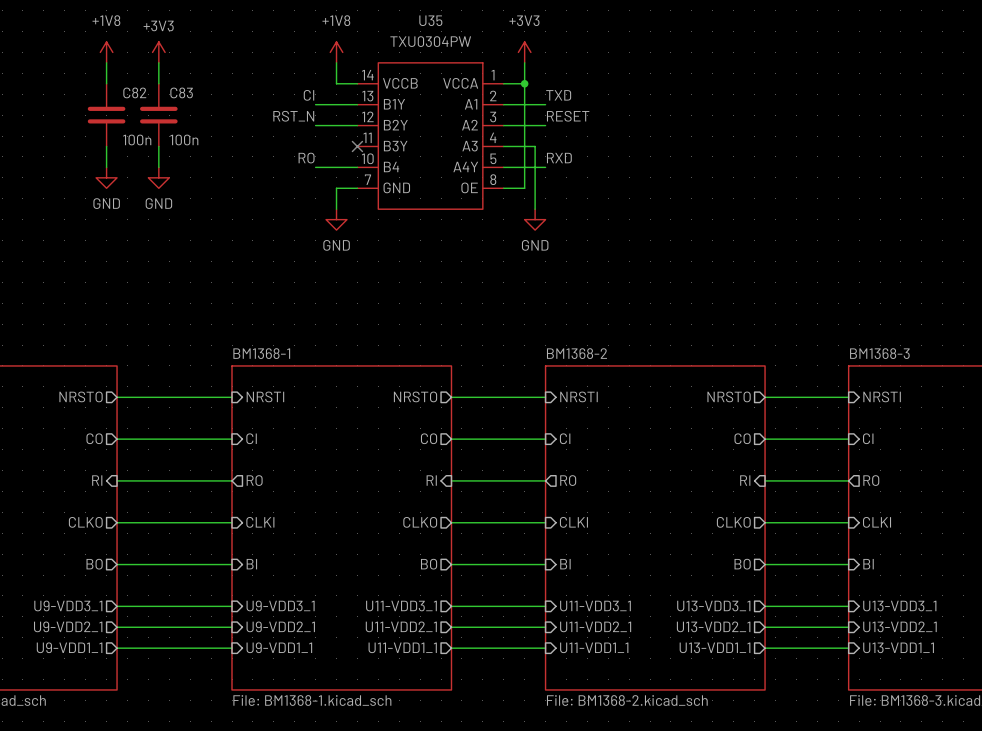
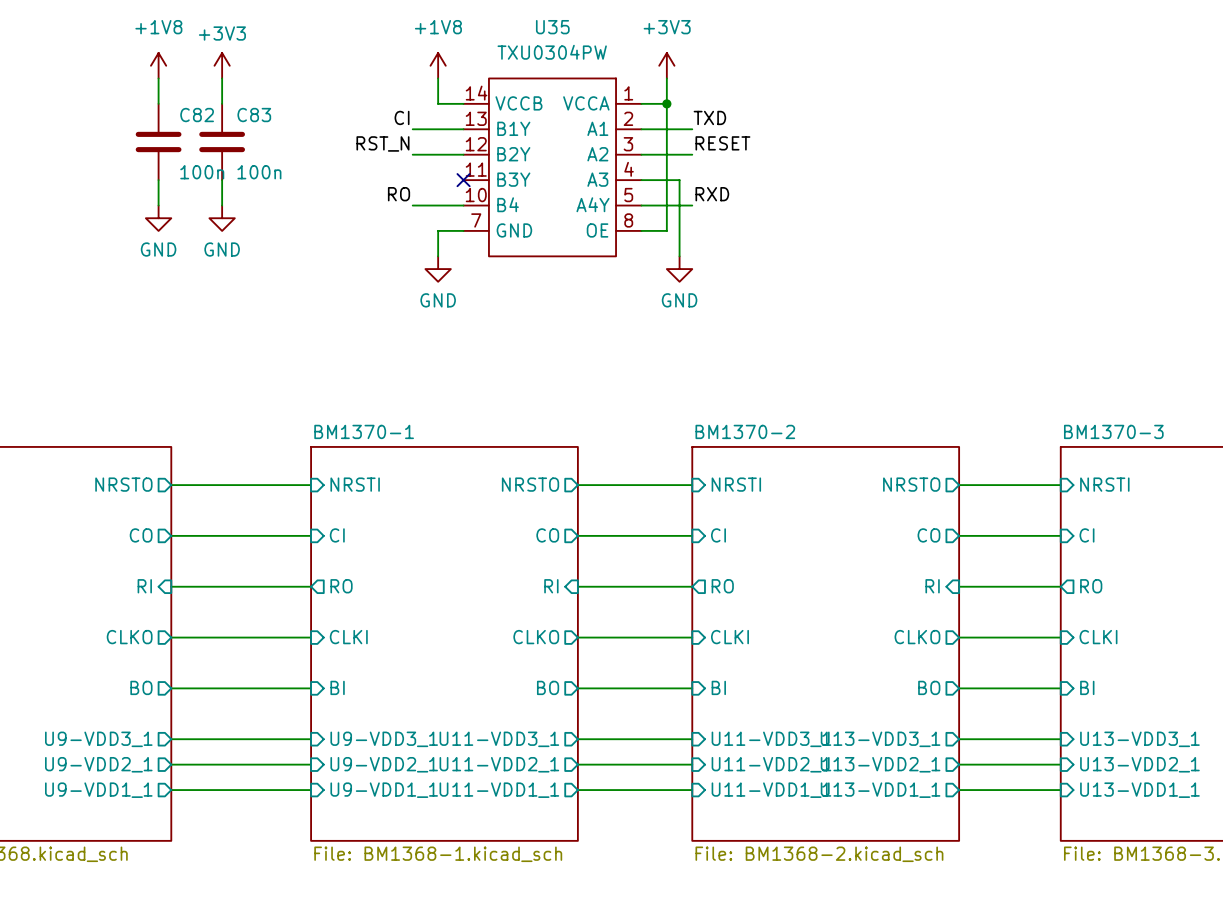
sheet BM1368-1 name: BM1368-1 (261, 353) -> BM1370-1 (364, 431)
sheet BM1368-2 name: BM1368-2 (576, 353) -> BM1370-2 (745, 431)
sheet BM1368-3 name: BM1368-3 (879, 353) -> BM1370-3 (1113, 431)

